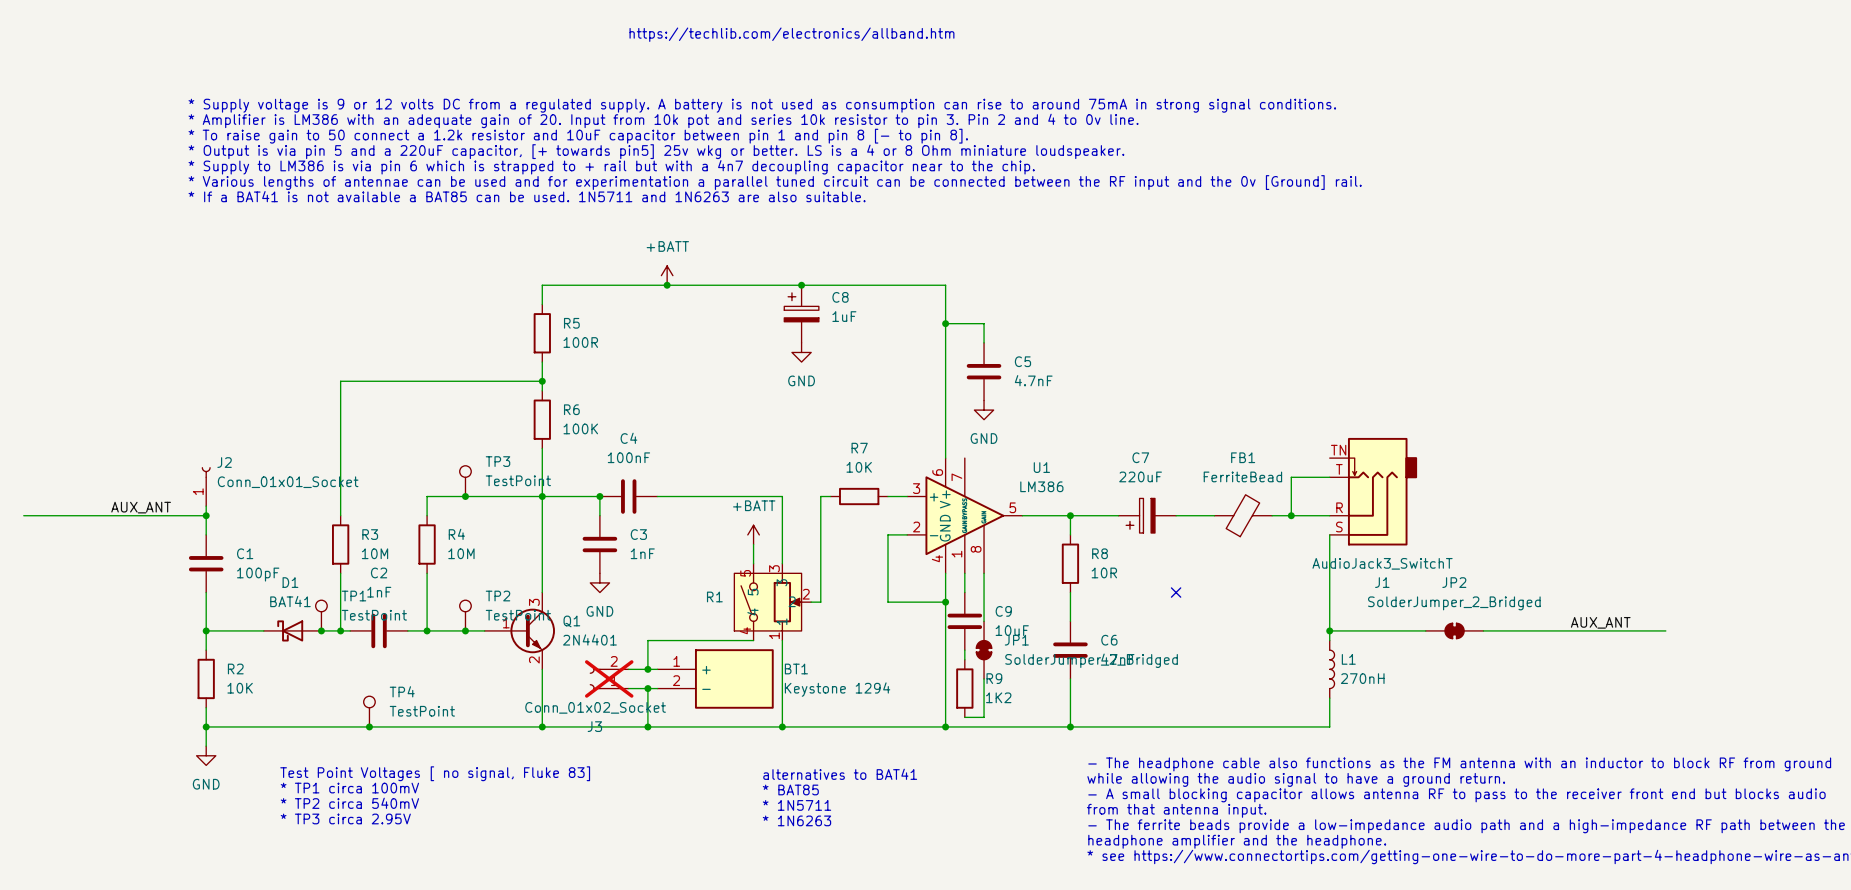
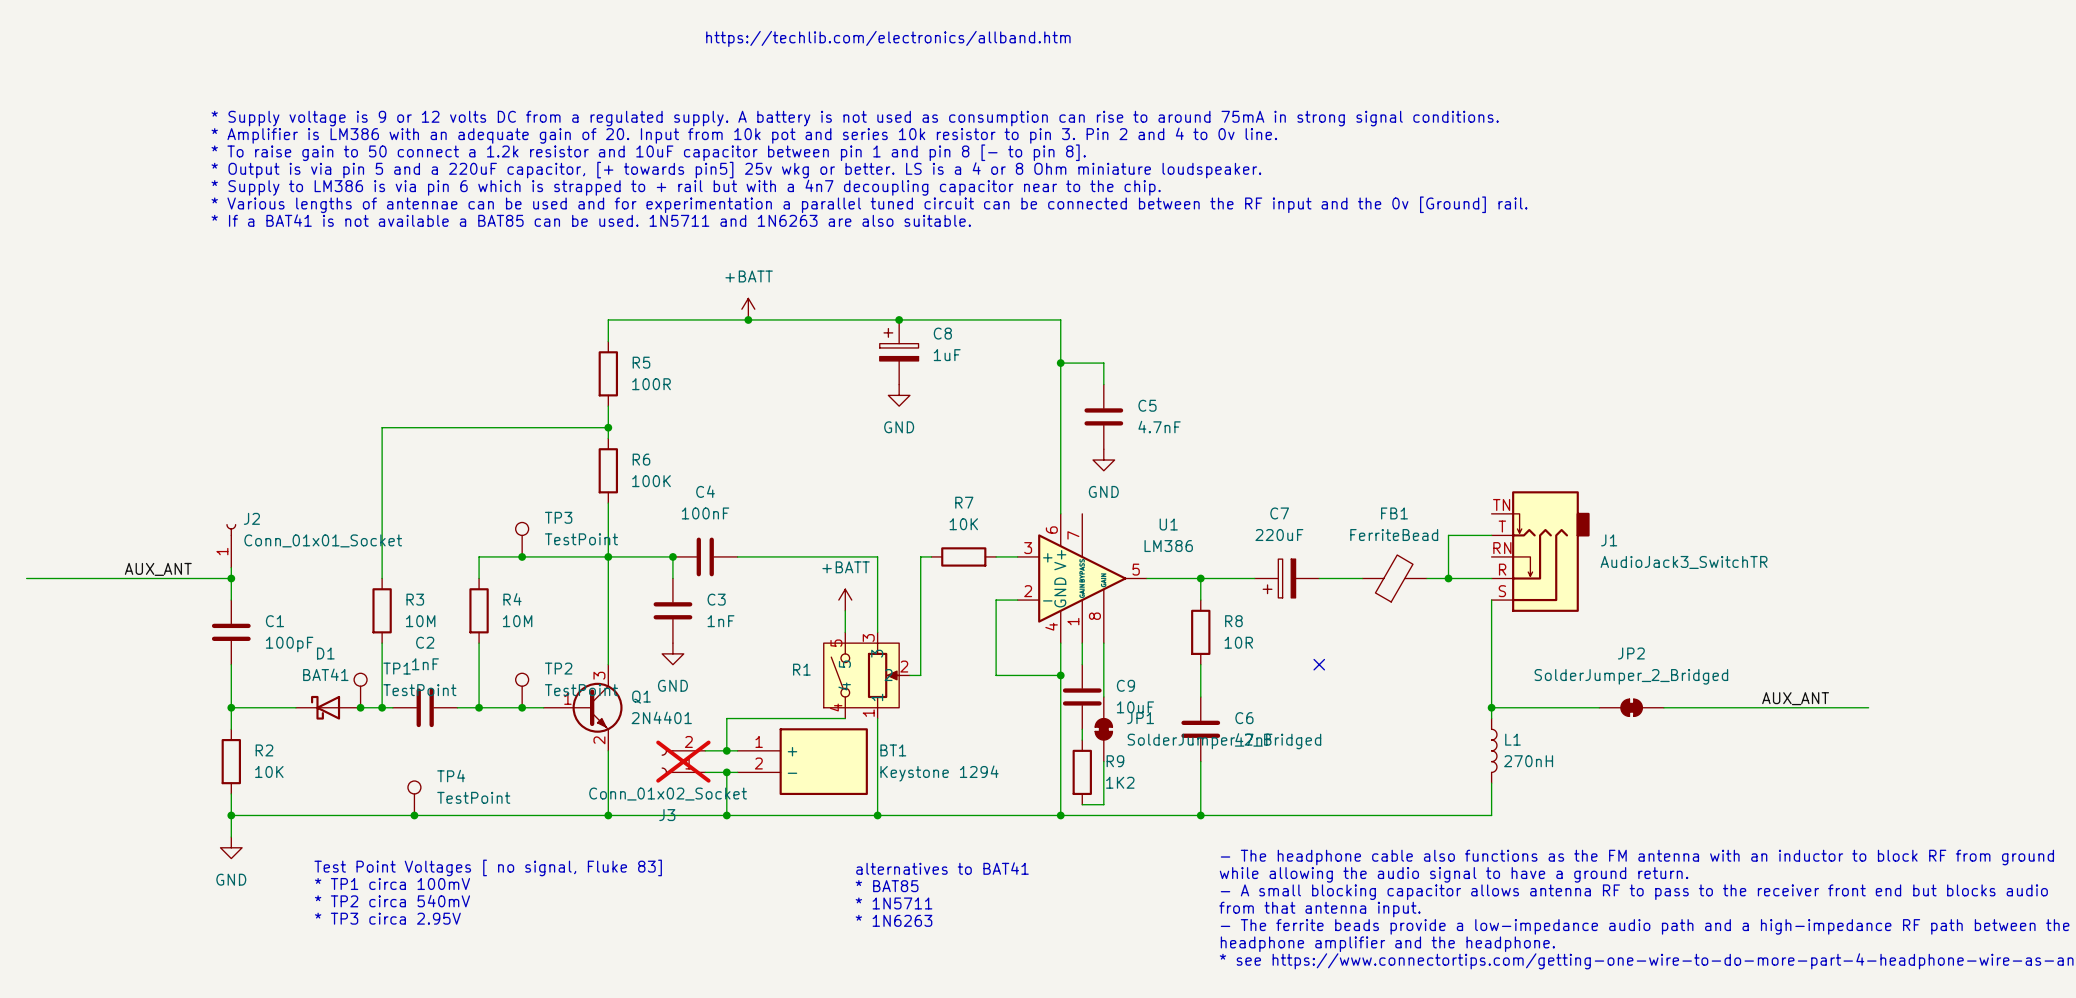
J1 symbol: [1329, 437, 1418, 546] -> [1491, 491, 1590, 612]
J1 value: AudioJack3_SwitchT (1382, 563) -> AudioJack3_SwitchTR (1684, 562)
J1 name position: J1 (1382, 582) -> J1 (1609, 540)

